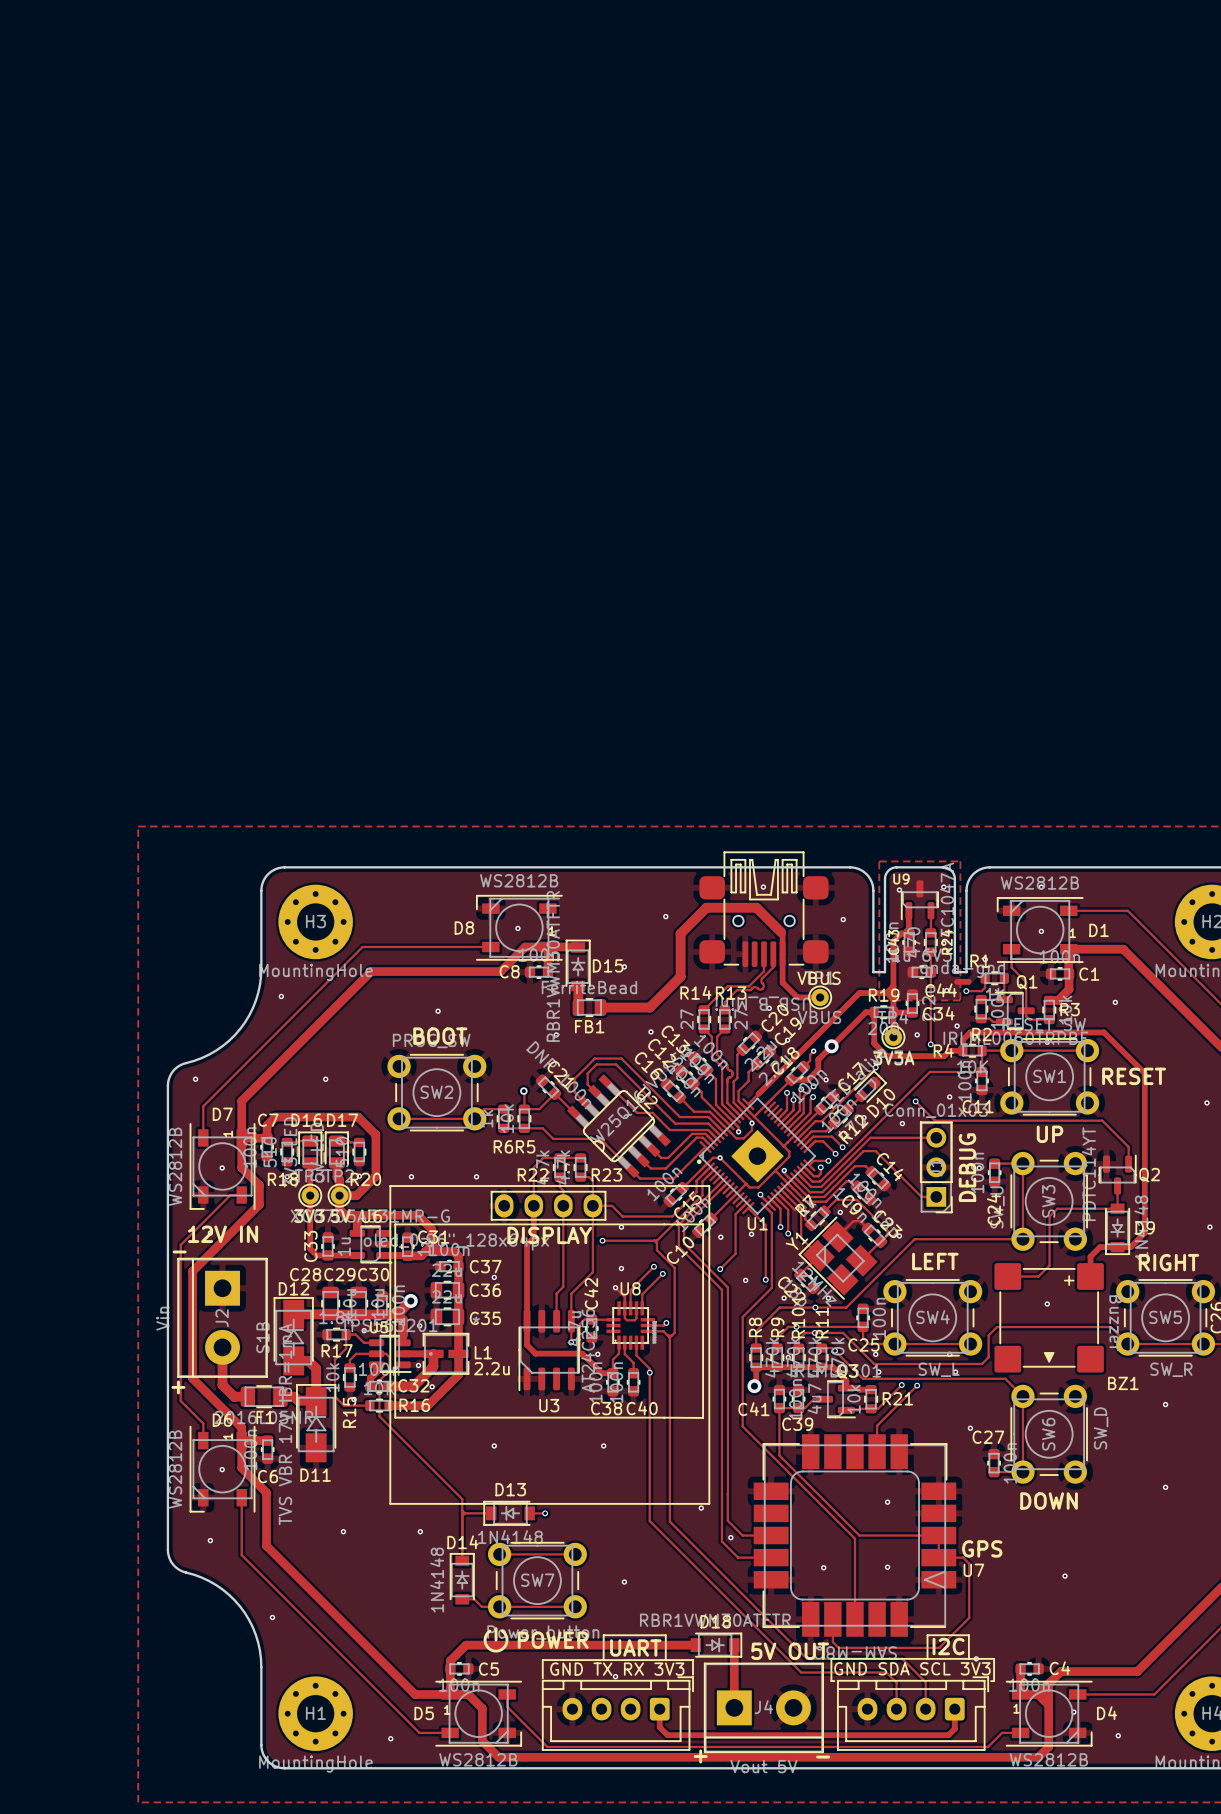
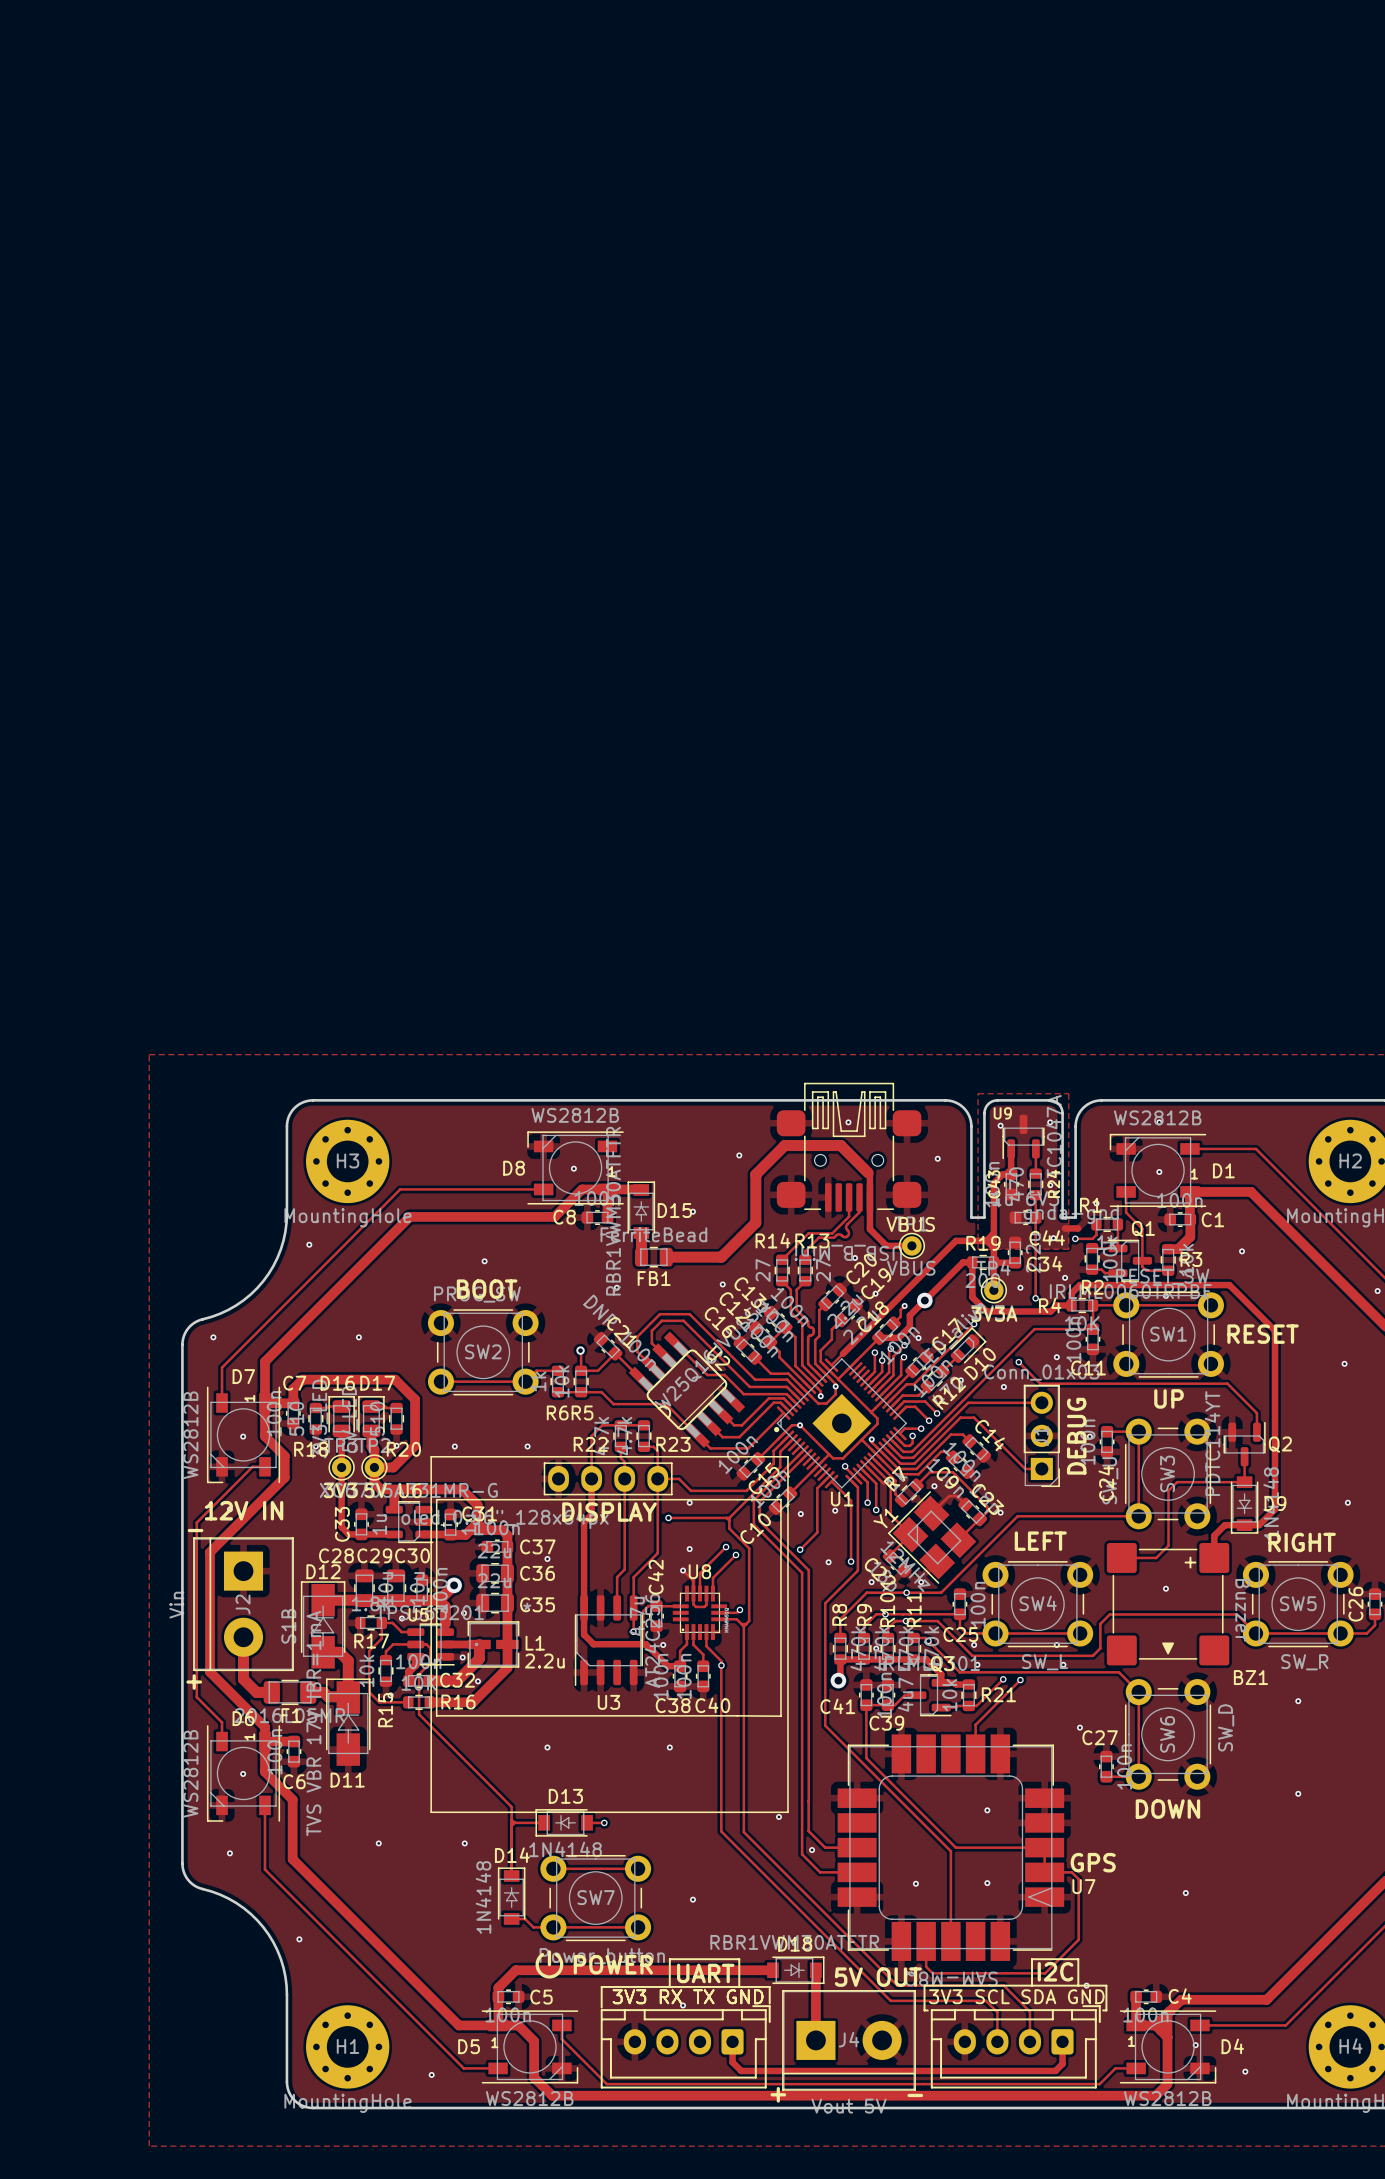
text: GND SDA SCL 3V3 (912, 1668) -> 3V3 SCL SDA GND (1016, 1996)
text: GND TX RX 3V3 (617, 1669) -> 3V3 RX TX GND (688, 1996)

